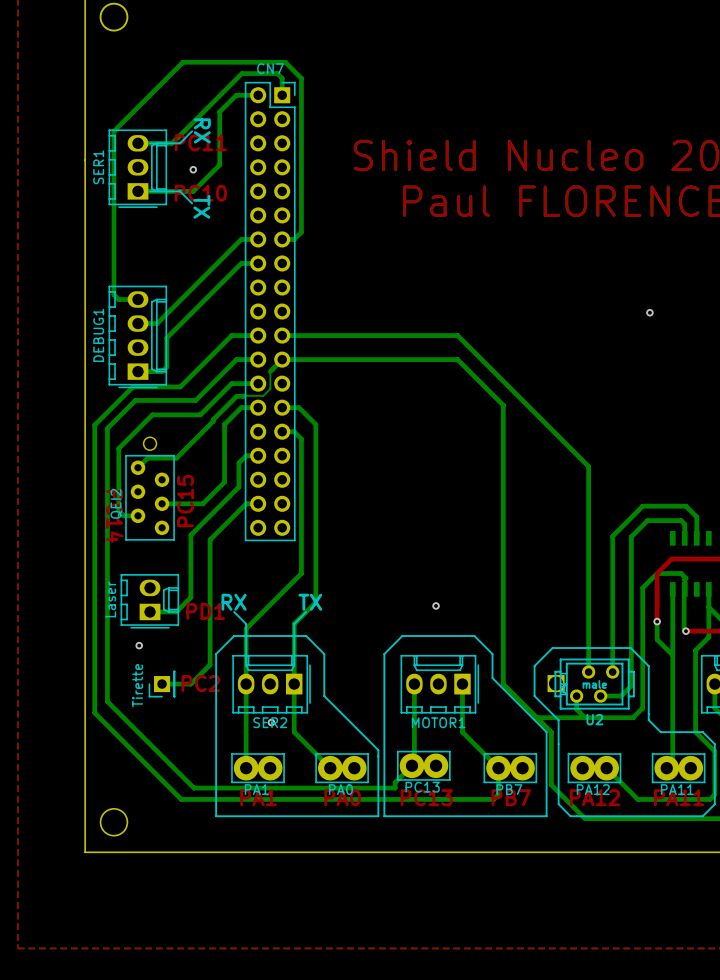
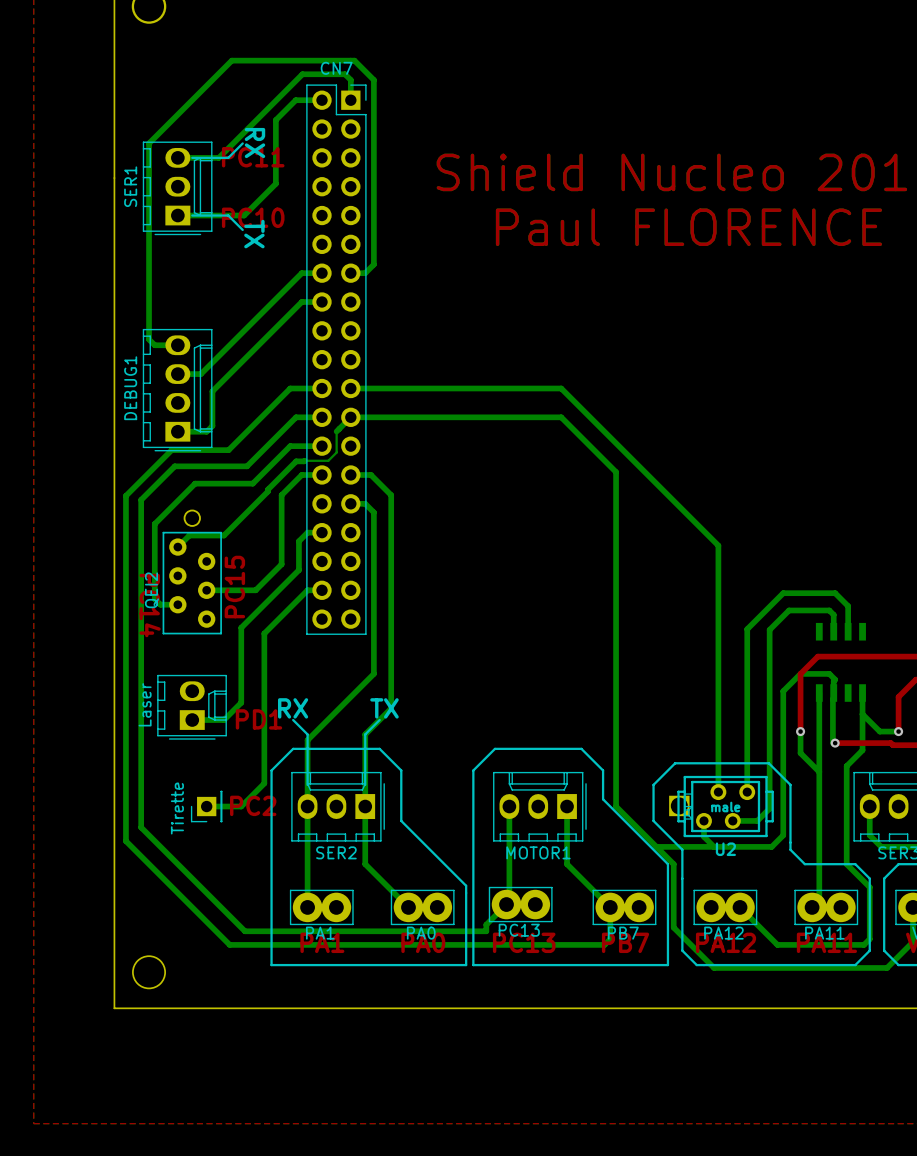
via: (193, 169) -> none
via: (649, 312) -> none
via: (436, 605) -> none
via: (139, 645) -> none
via: (271, 722) -> none

